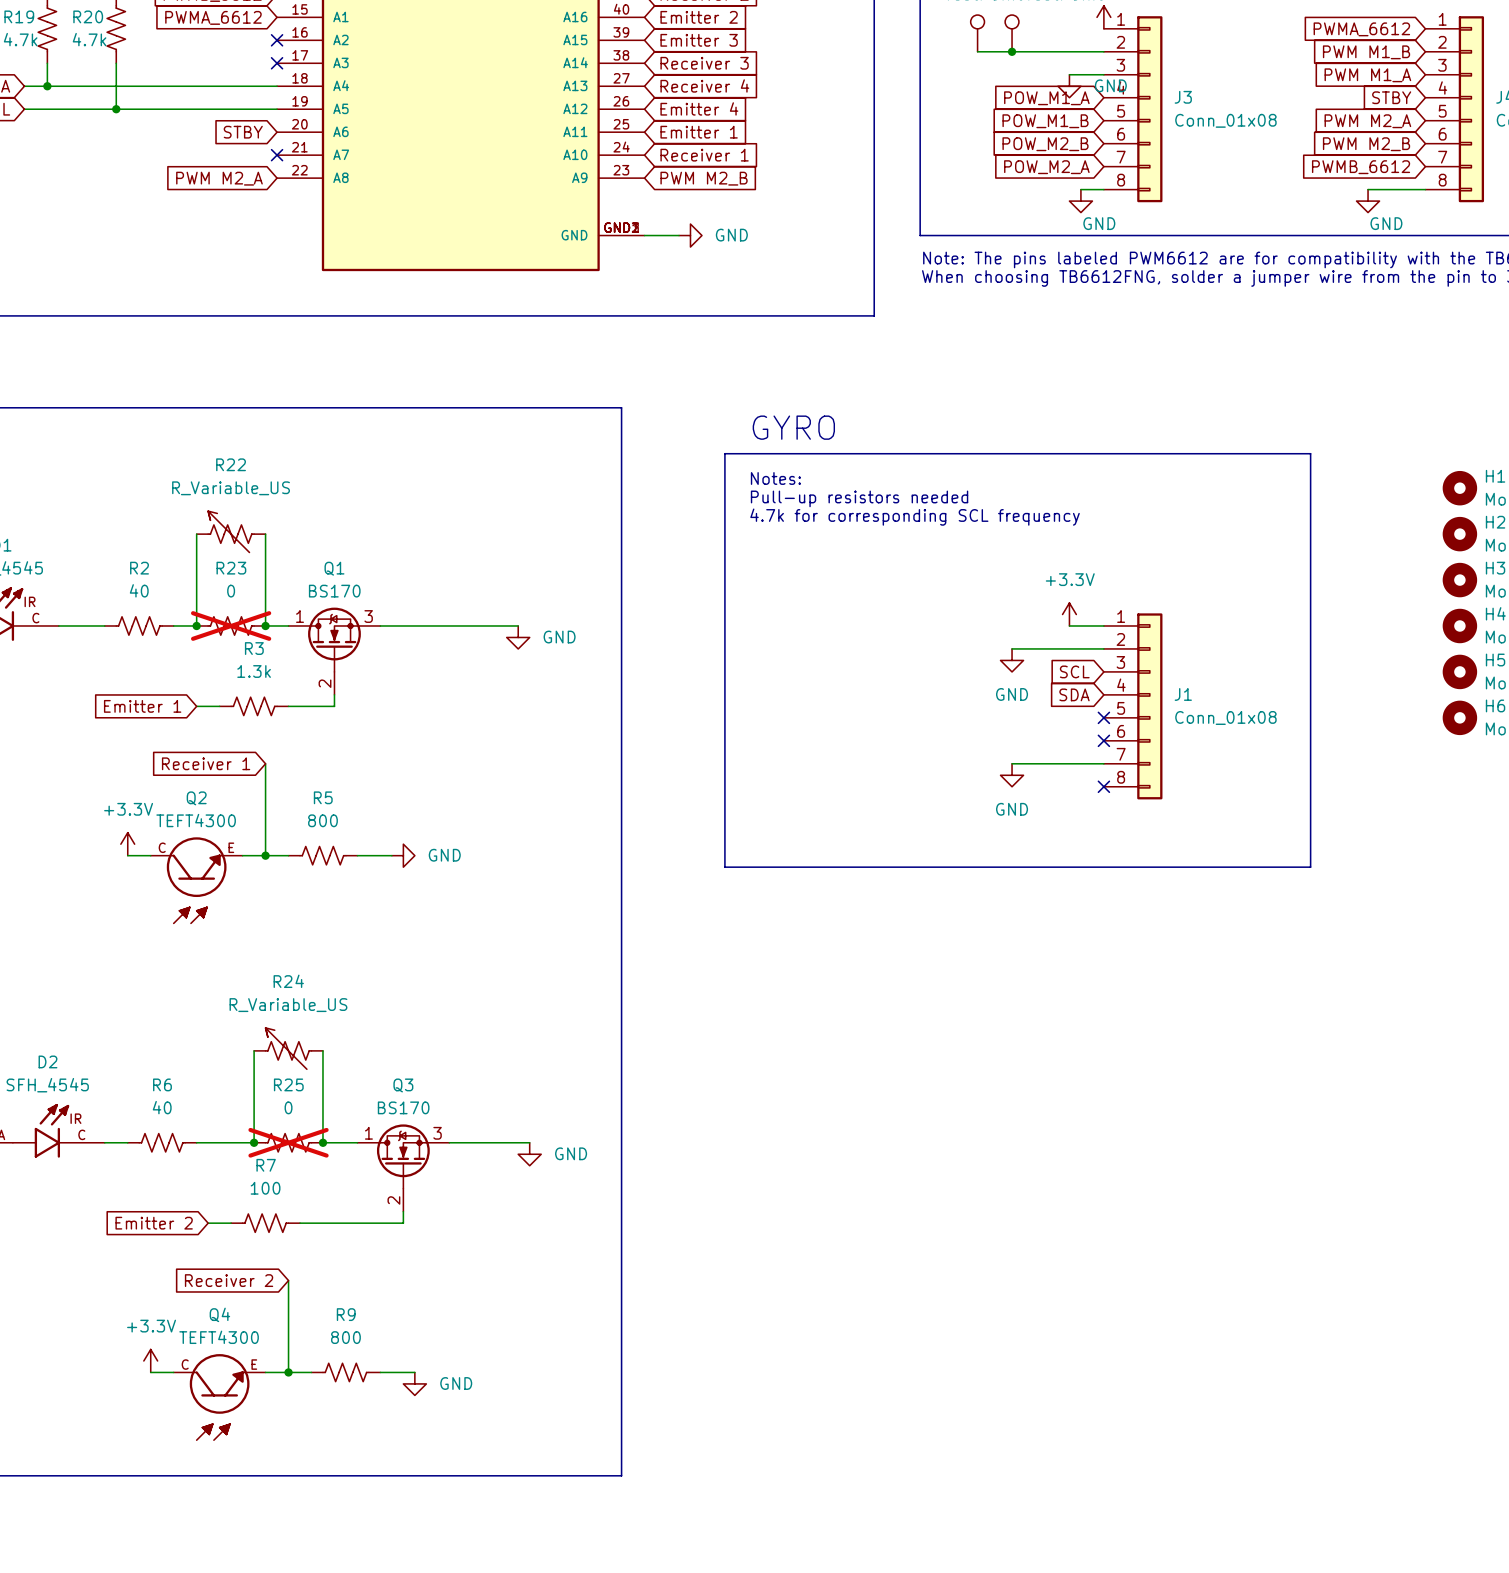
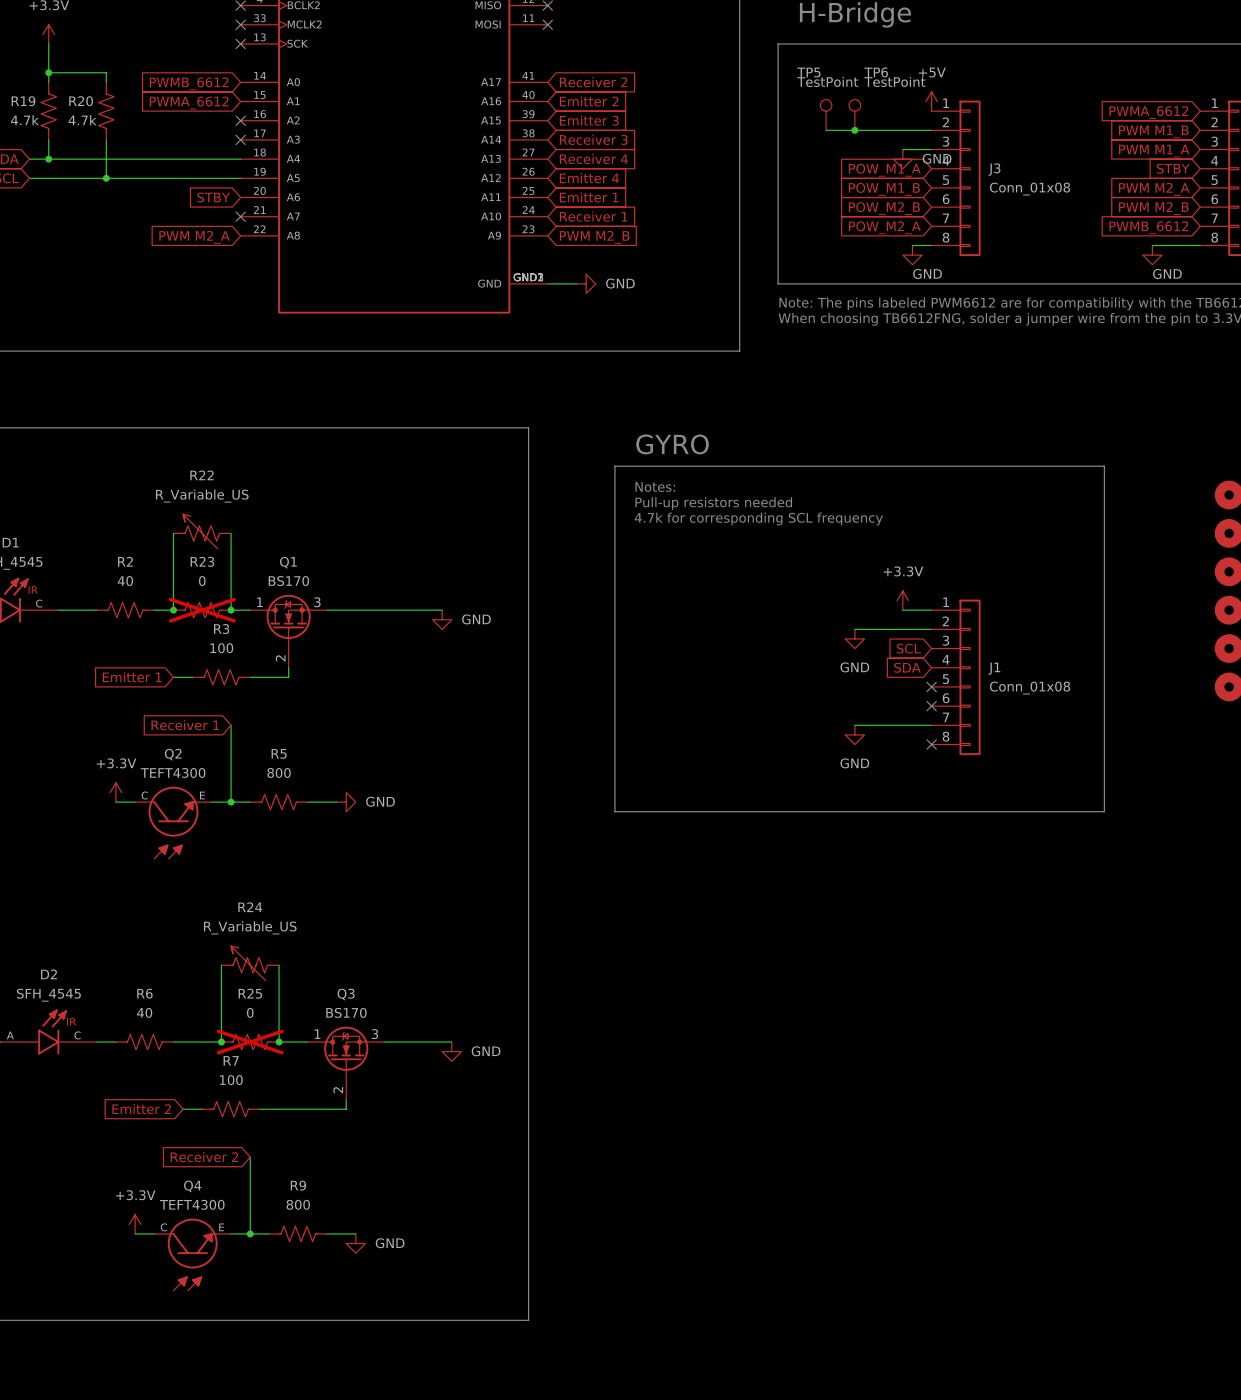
R3 value: 1.3k (254, 671) -> 100 (221, 648)

